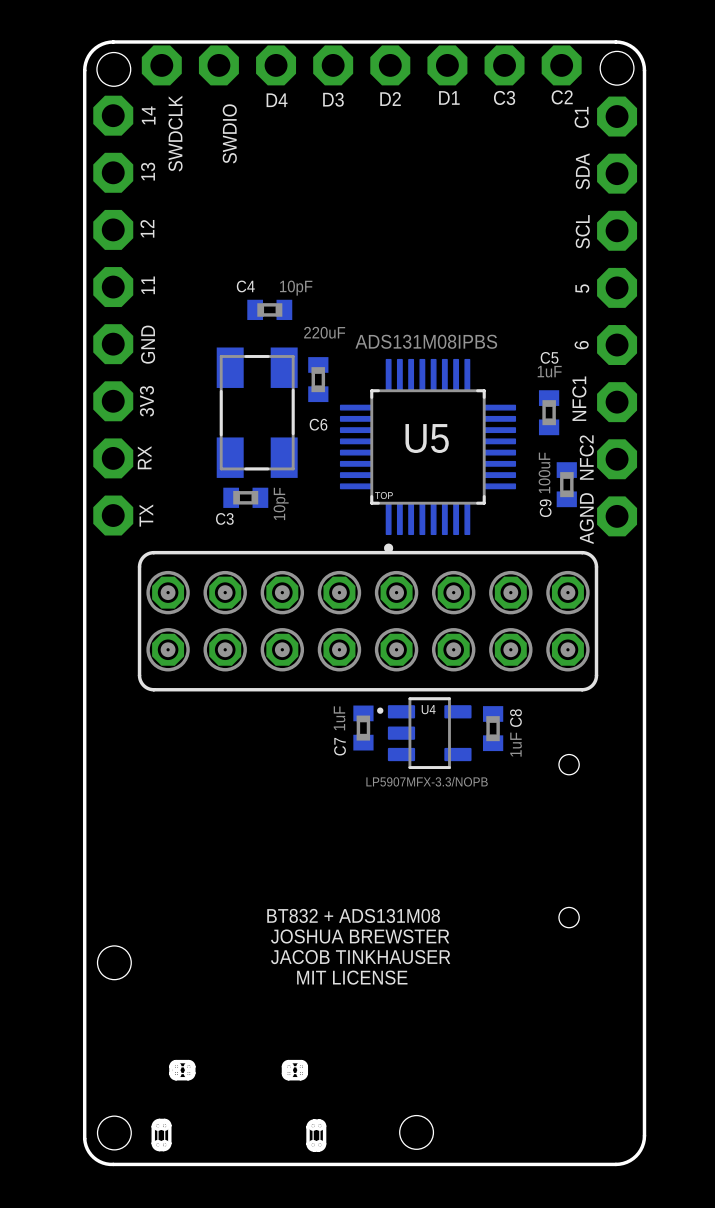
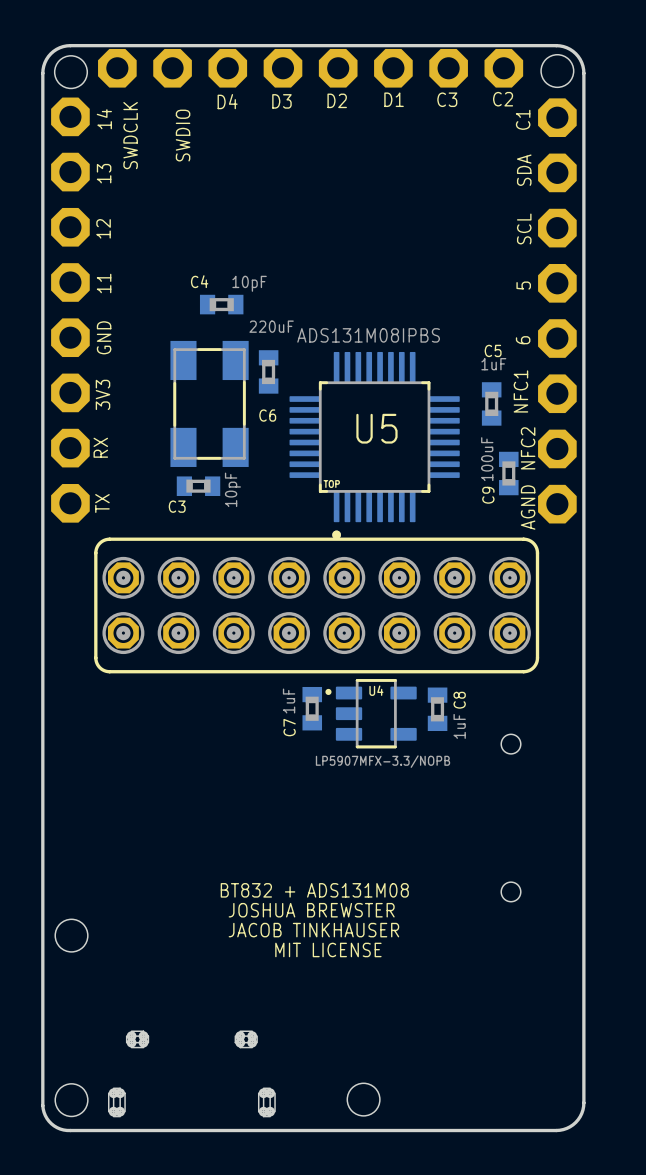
board edge: (188, 1061) (172, 1063) (170, 1066) (172, 1077) (188, 1078) (192, 1077) (193, 1065) (188, 1061) -> none
board edge: (301, 1061) (284, 1063) (283, 1066) (284, 1077) (300, 1078) (304, 1077) (306, 1065) (301, 1061) -> none
board edge: (164, 1120) (157, 1120) (153, 1125) (153, 1144) (157, 1149) (165, 1149) (169, 1144) (169, 1124) (164, 1120) -> none
board edge: (319, 1121) (311, 1121) (308, 1125) (308, 1144) (312, 1149) (320, 1149) (324, 1145) (324, 1124) (319, 1121) -> none

